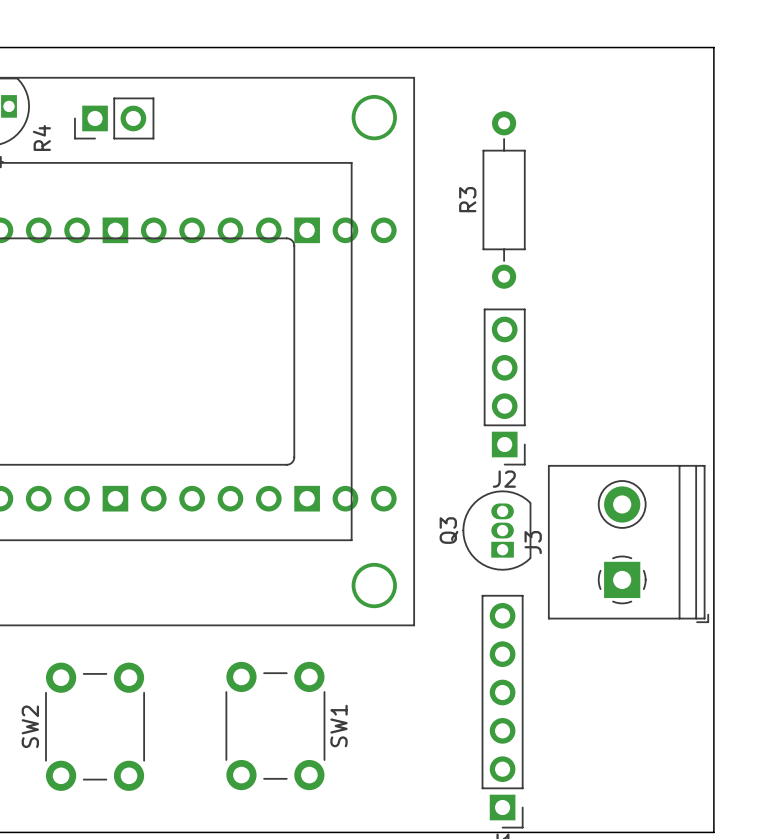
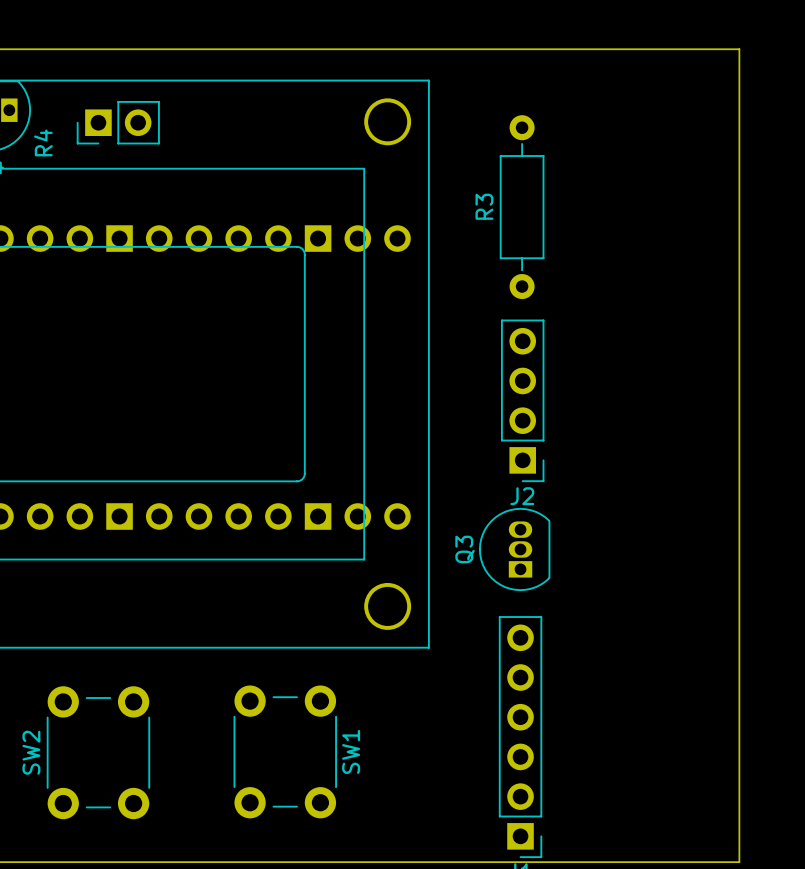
J3: (628, 544) -> none

